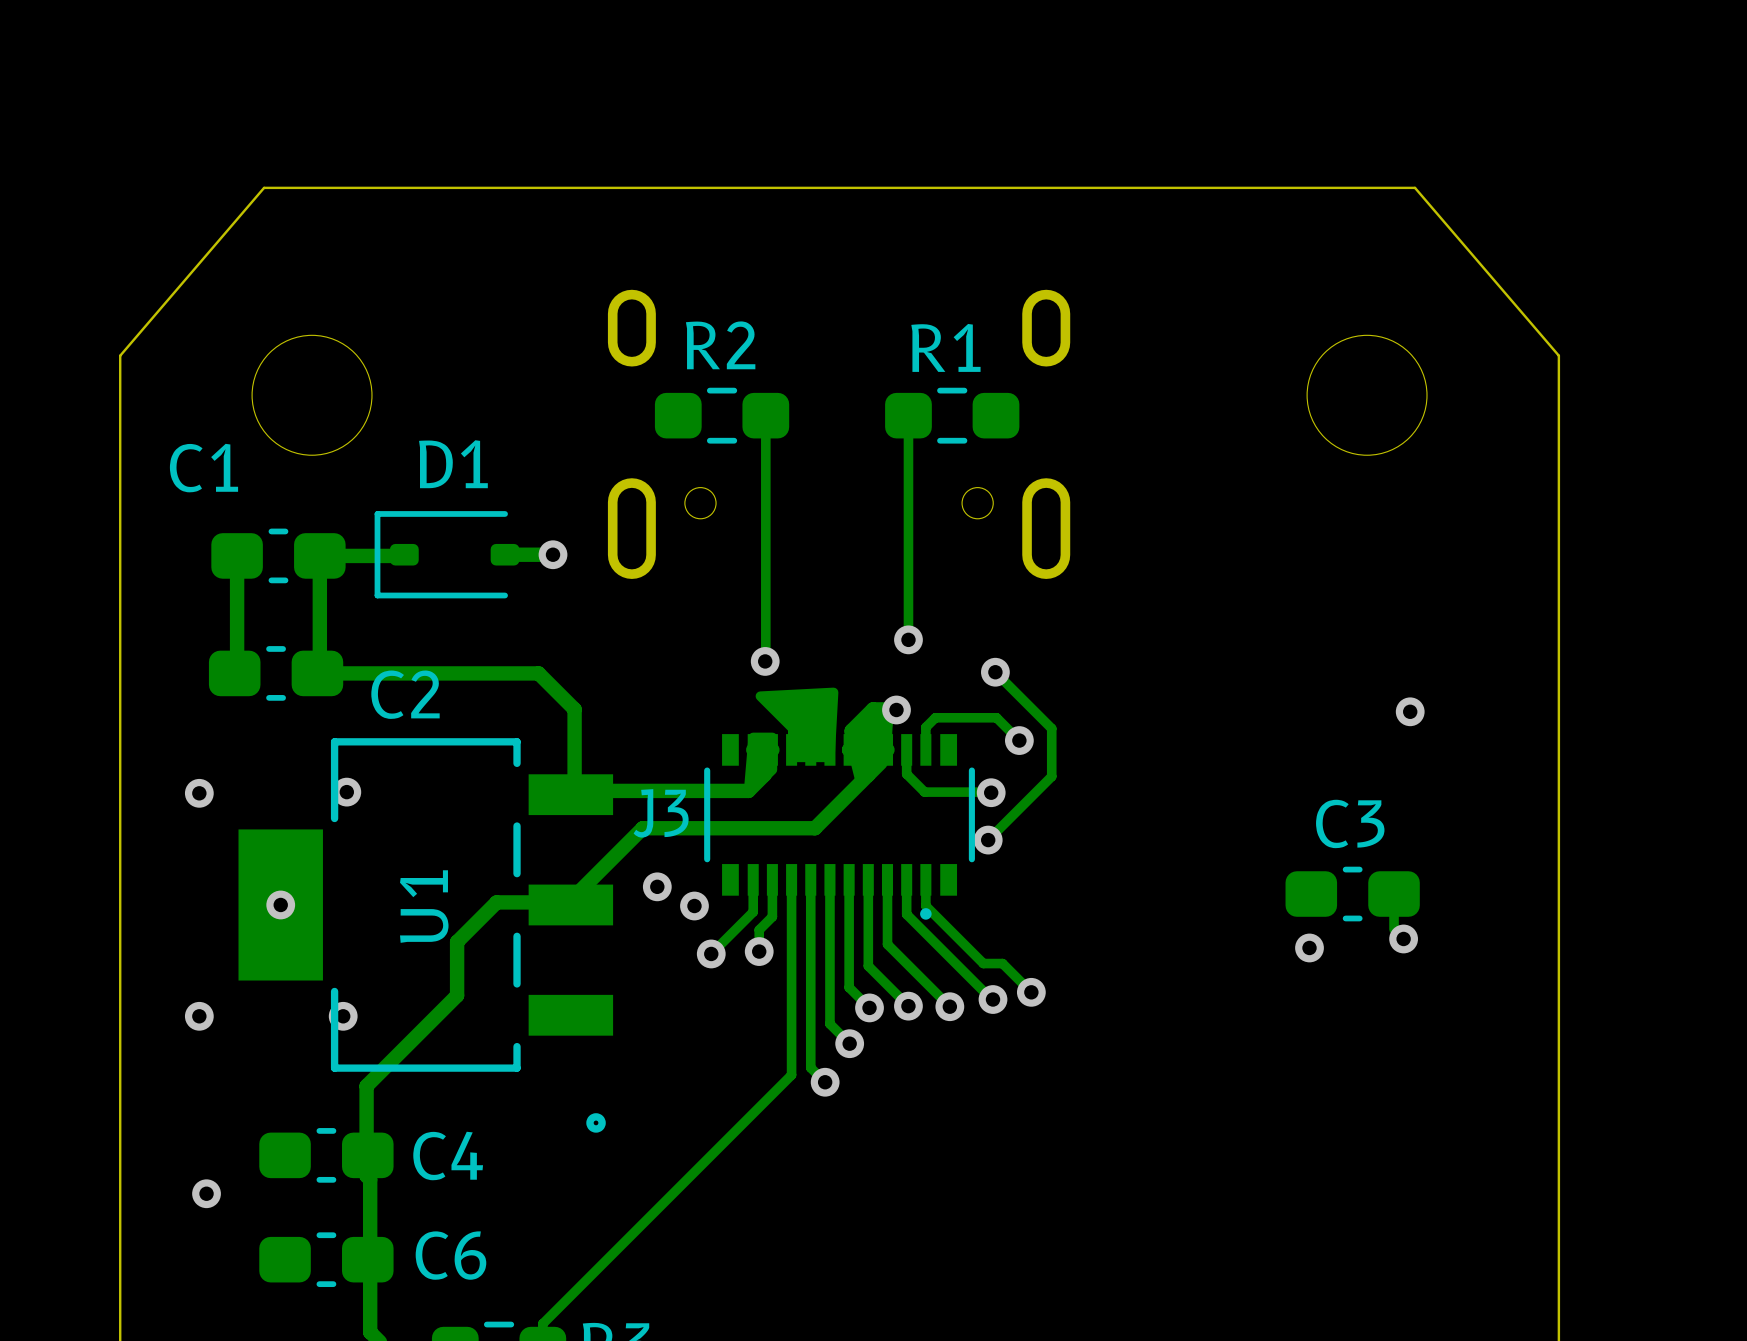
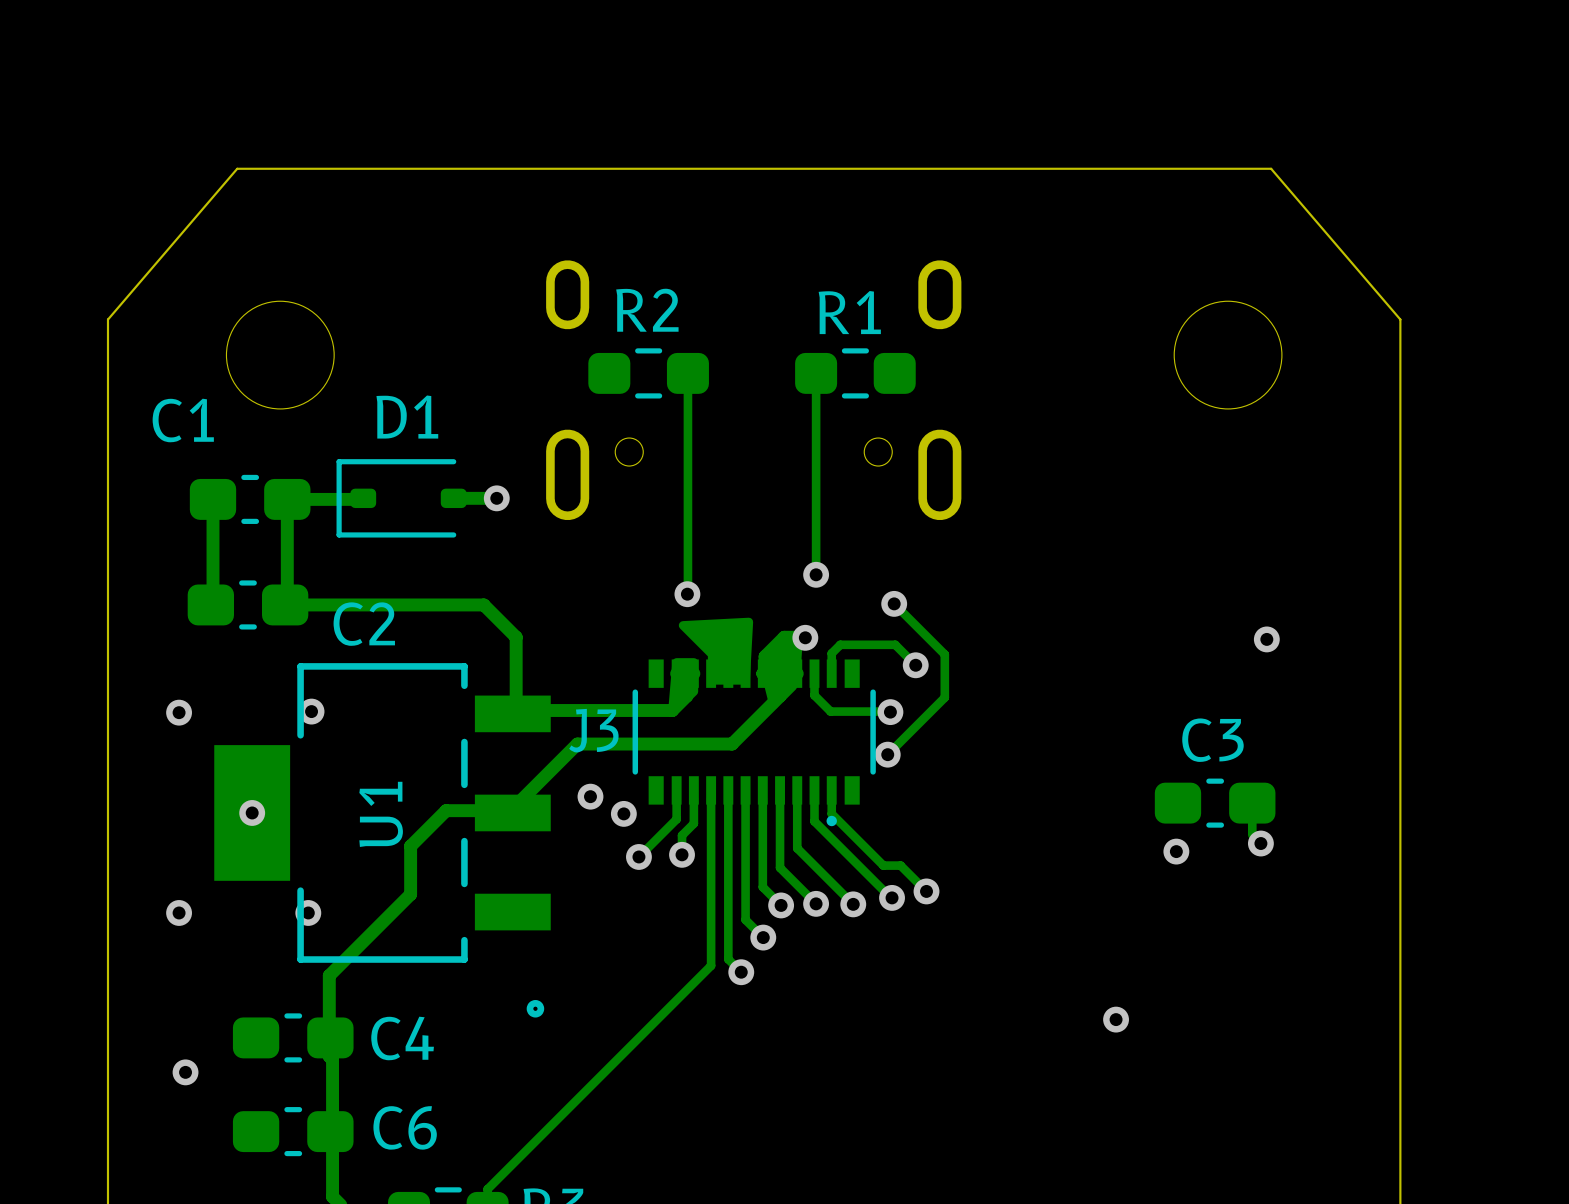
via: none -> (1116, 1019)

